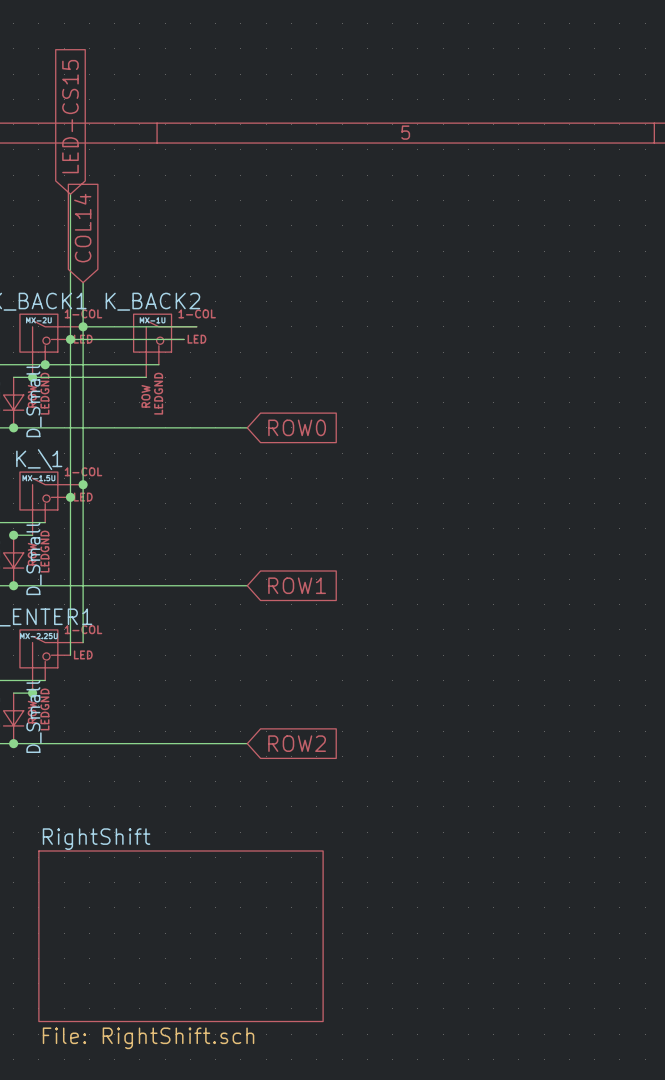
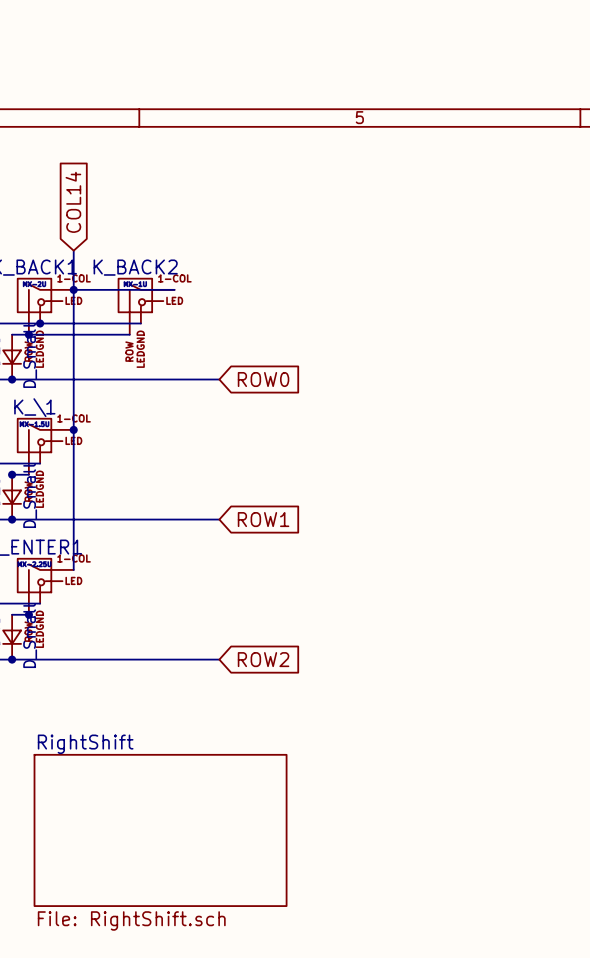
global label: LED-CS15 (70, 116) -> none
wire: (70, 194) (70, 655) -> none
wire: (70, 339) (184, 339) -> none
junction: (70, 339) -> none
junction: (70, 497) -> none

